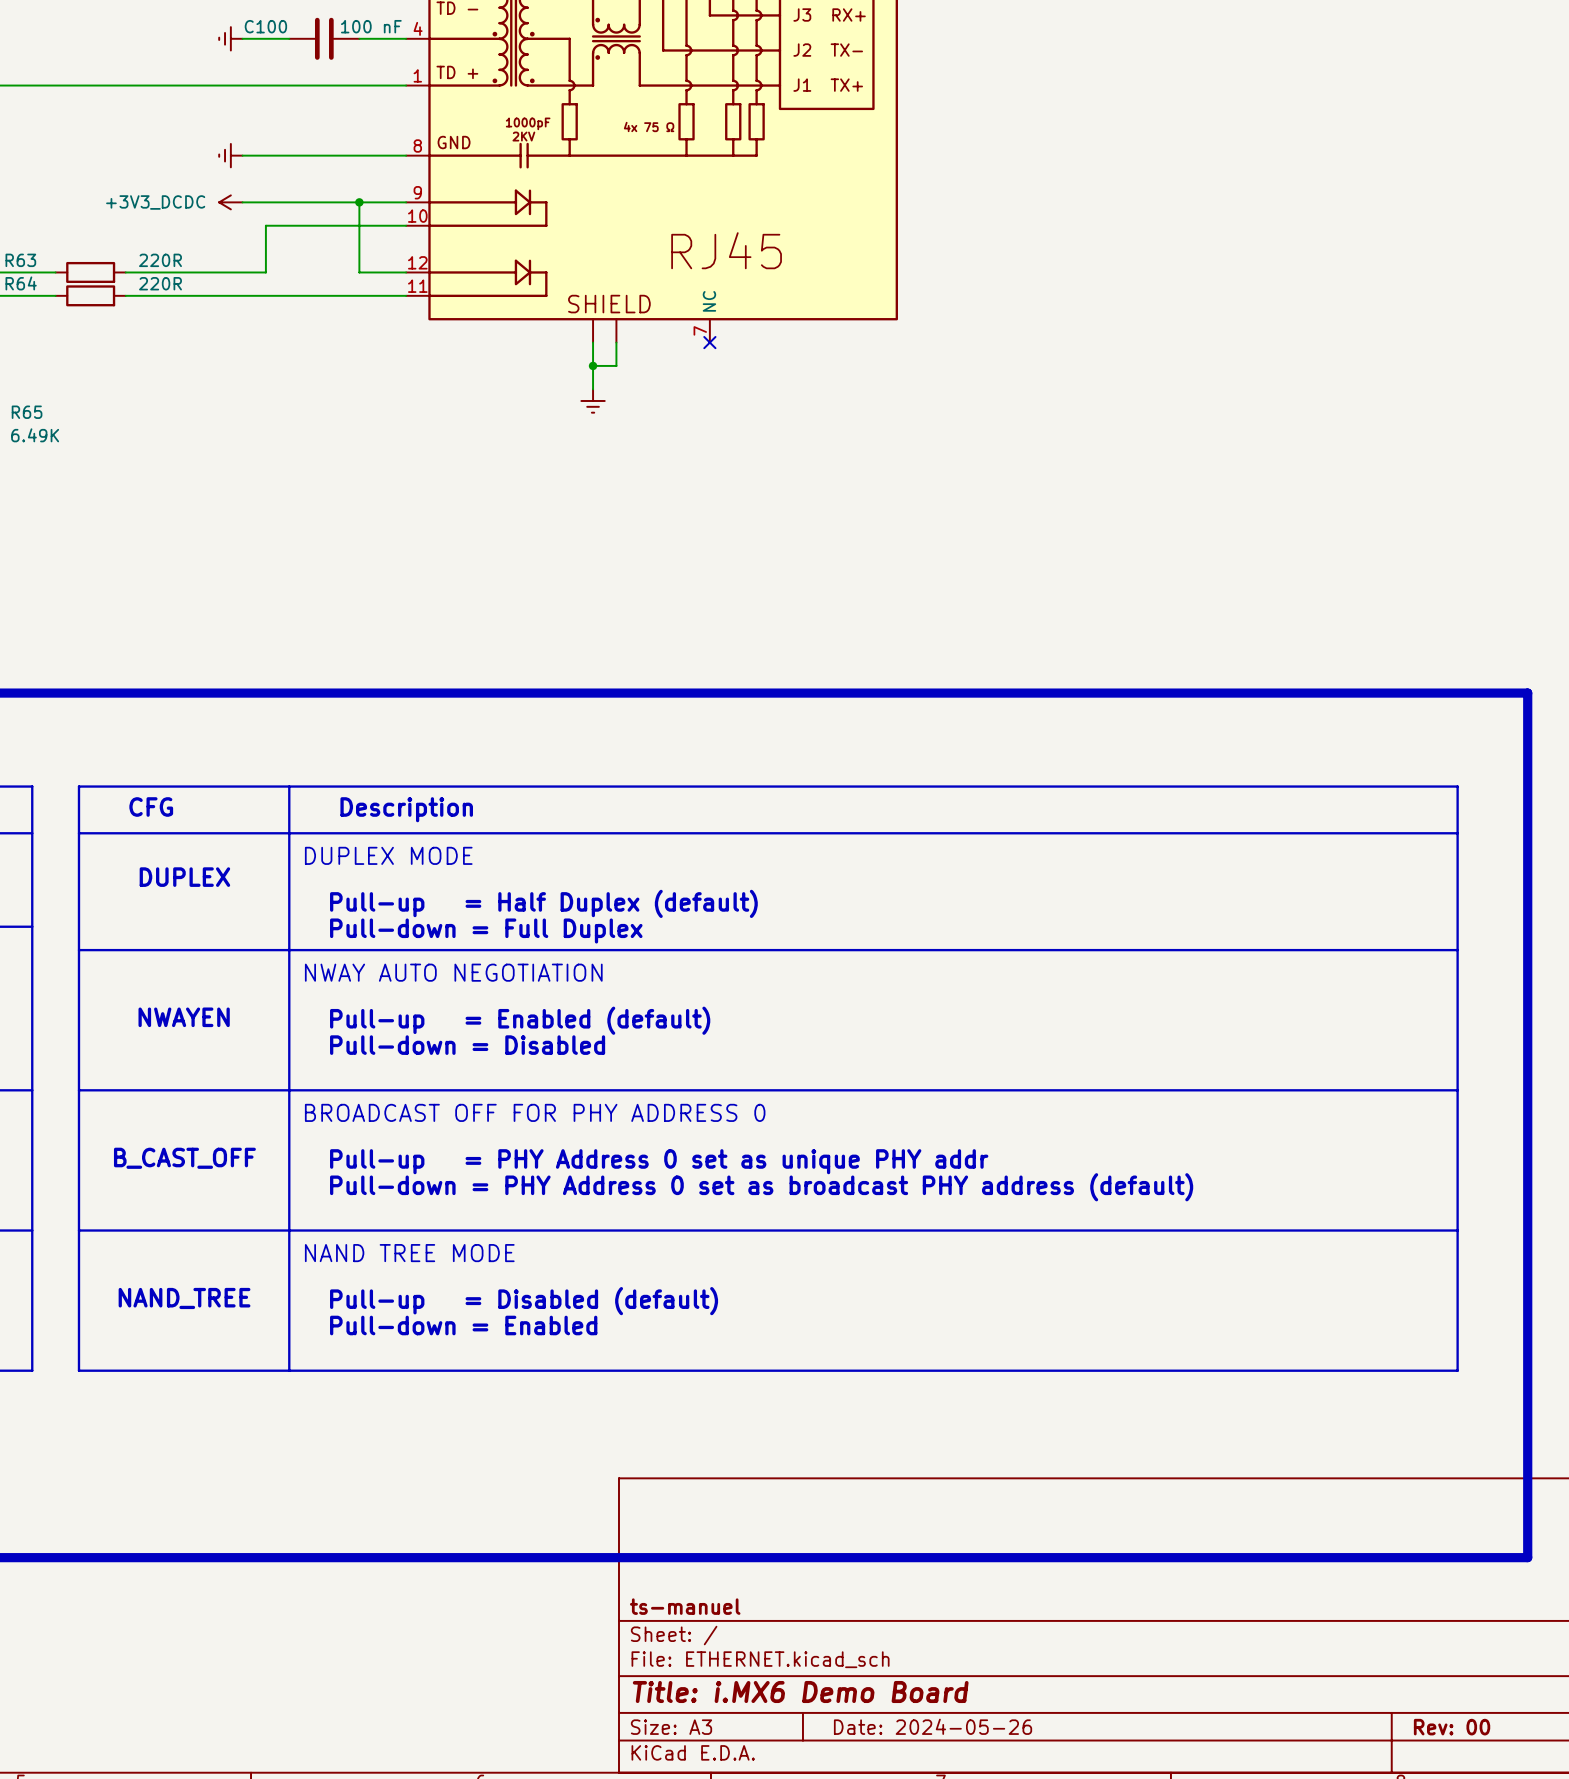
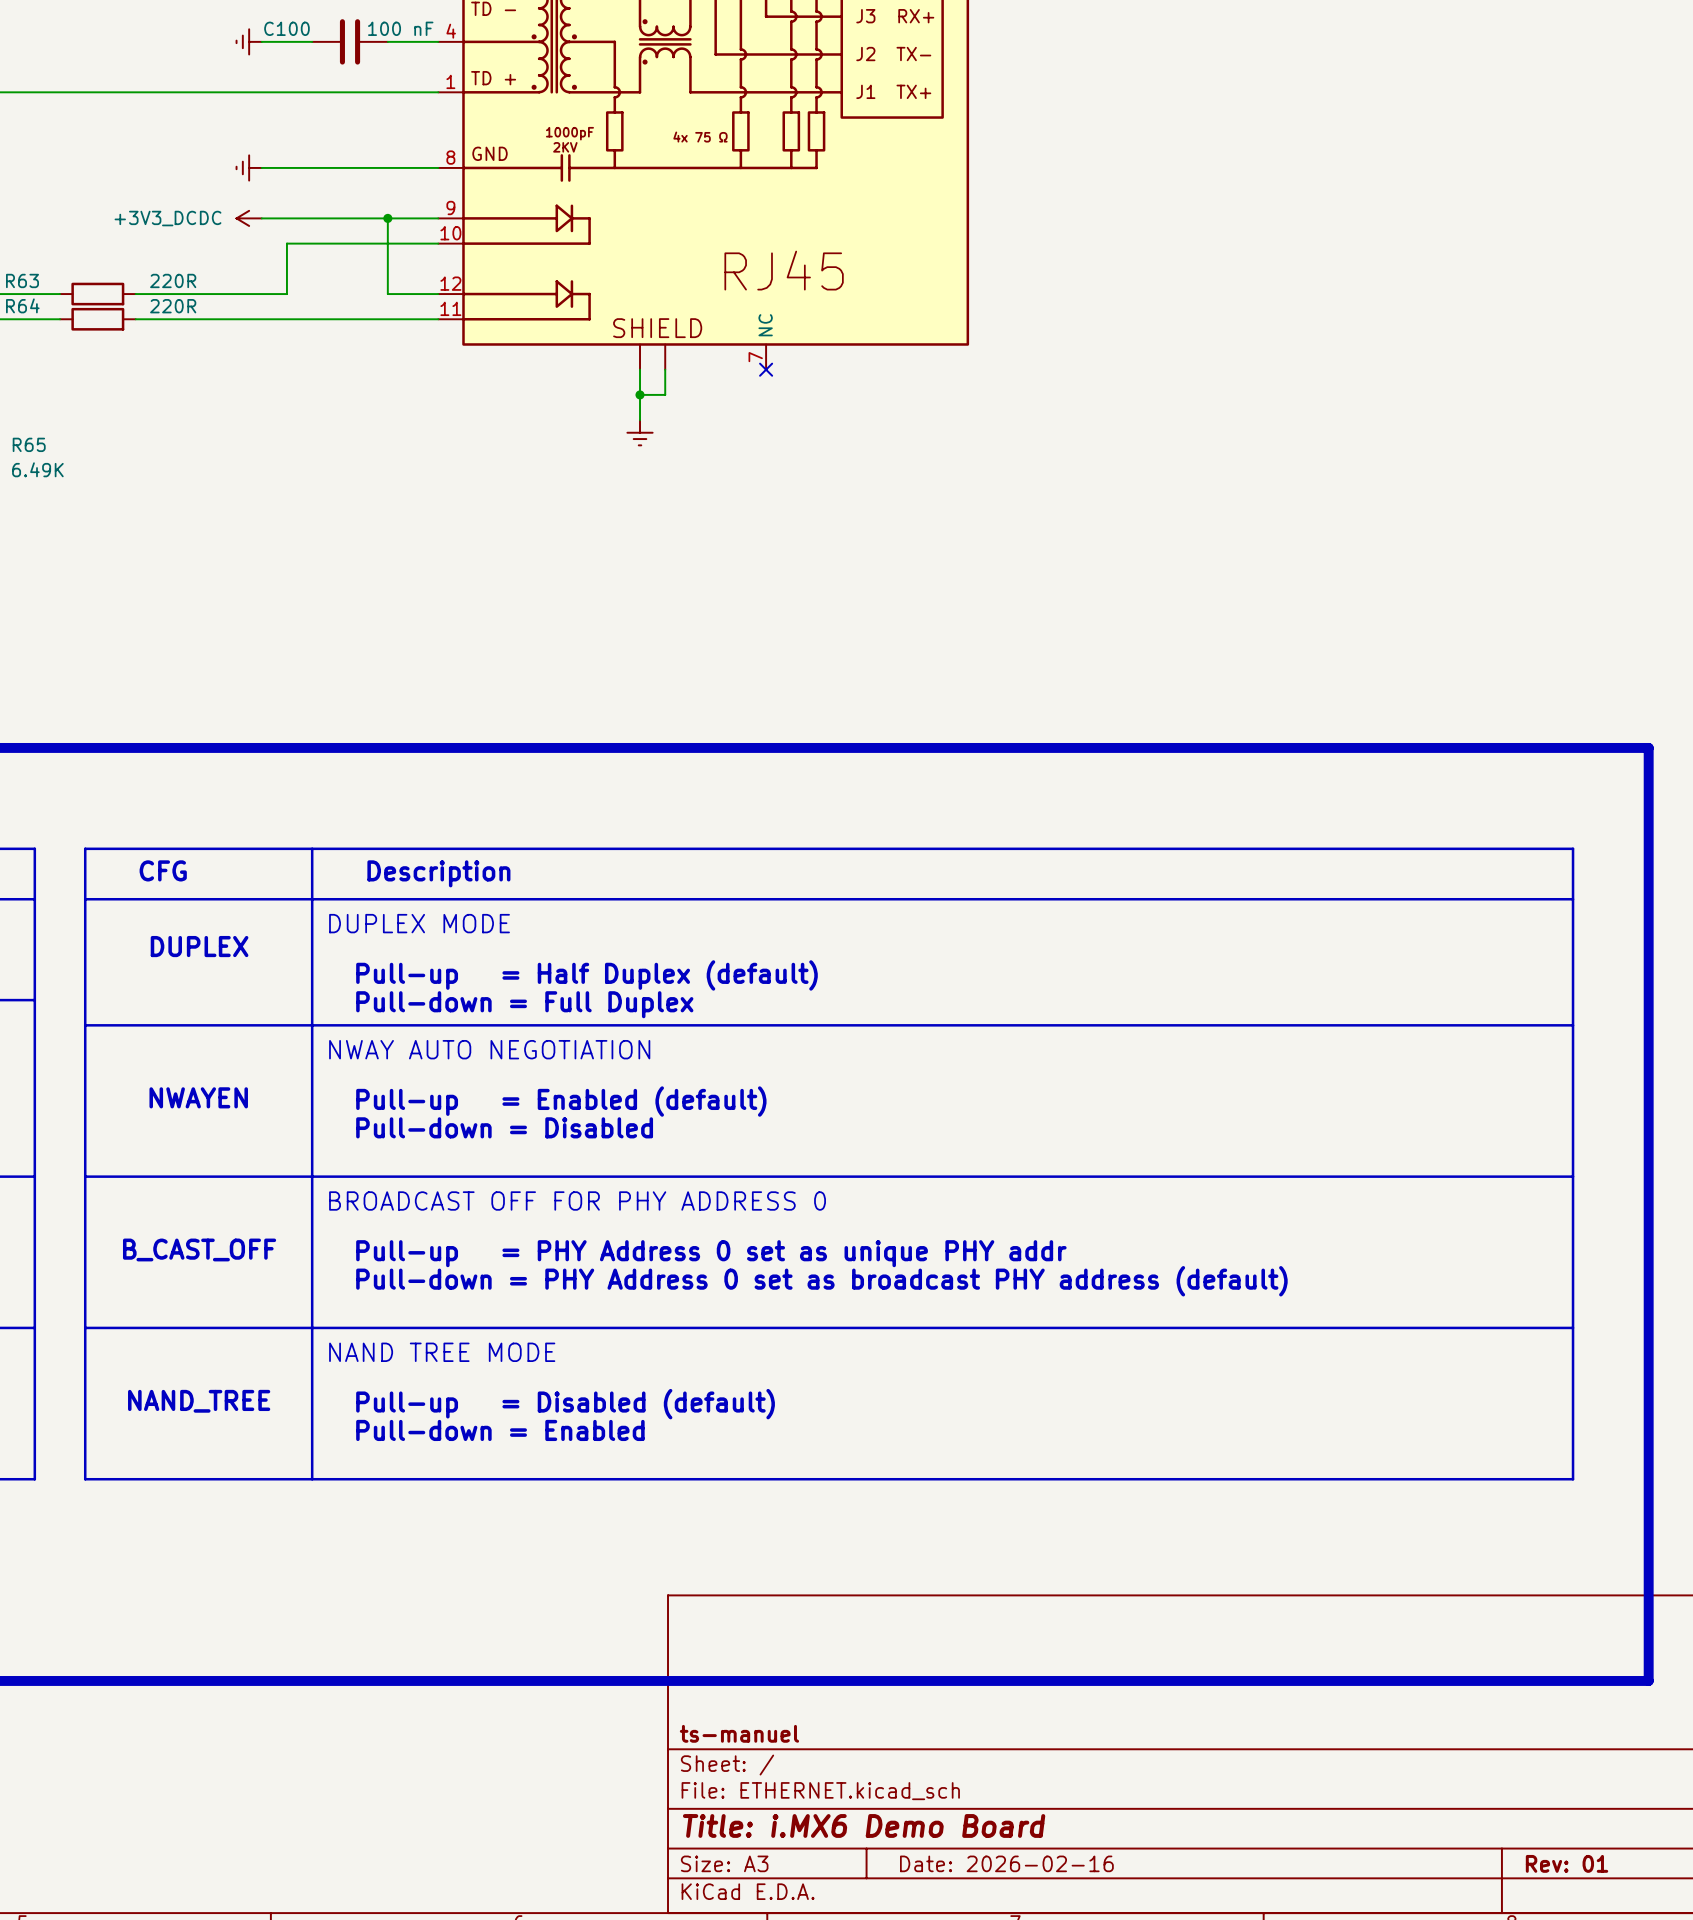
title block: Date: 2024-05-26 (933, 1726) -> Date: 2026-02-16 (1006, 1863)
title block: Rev: 00 (1452, 1727) -> Rev: 01 (1567, 1863)

